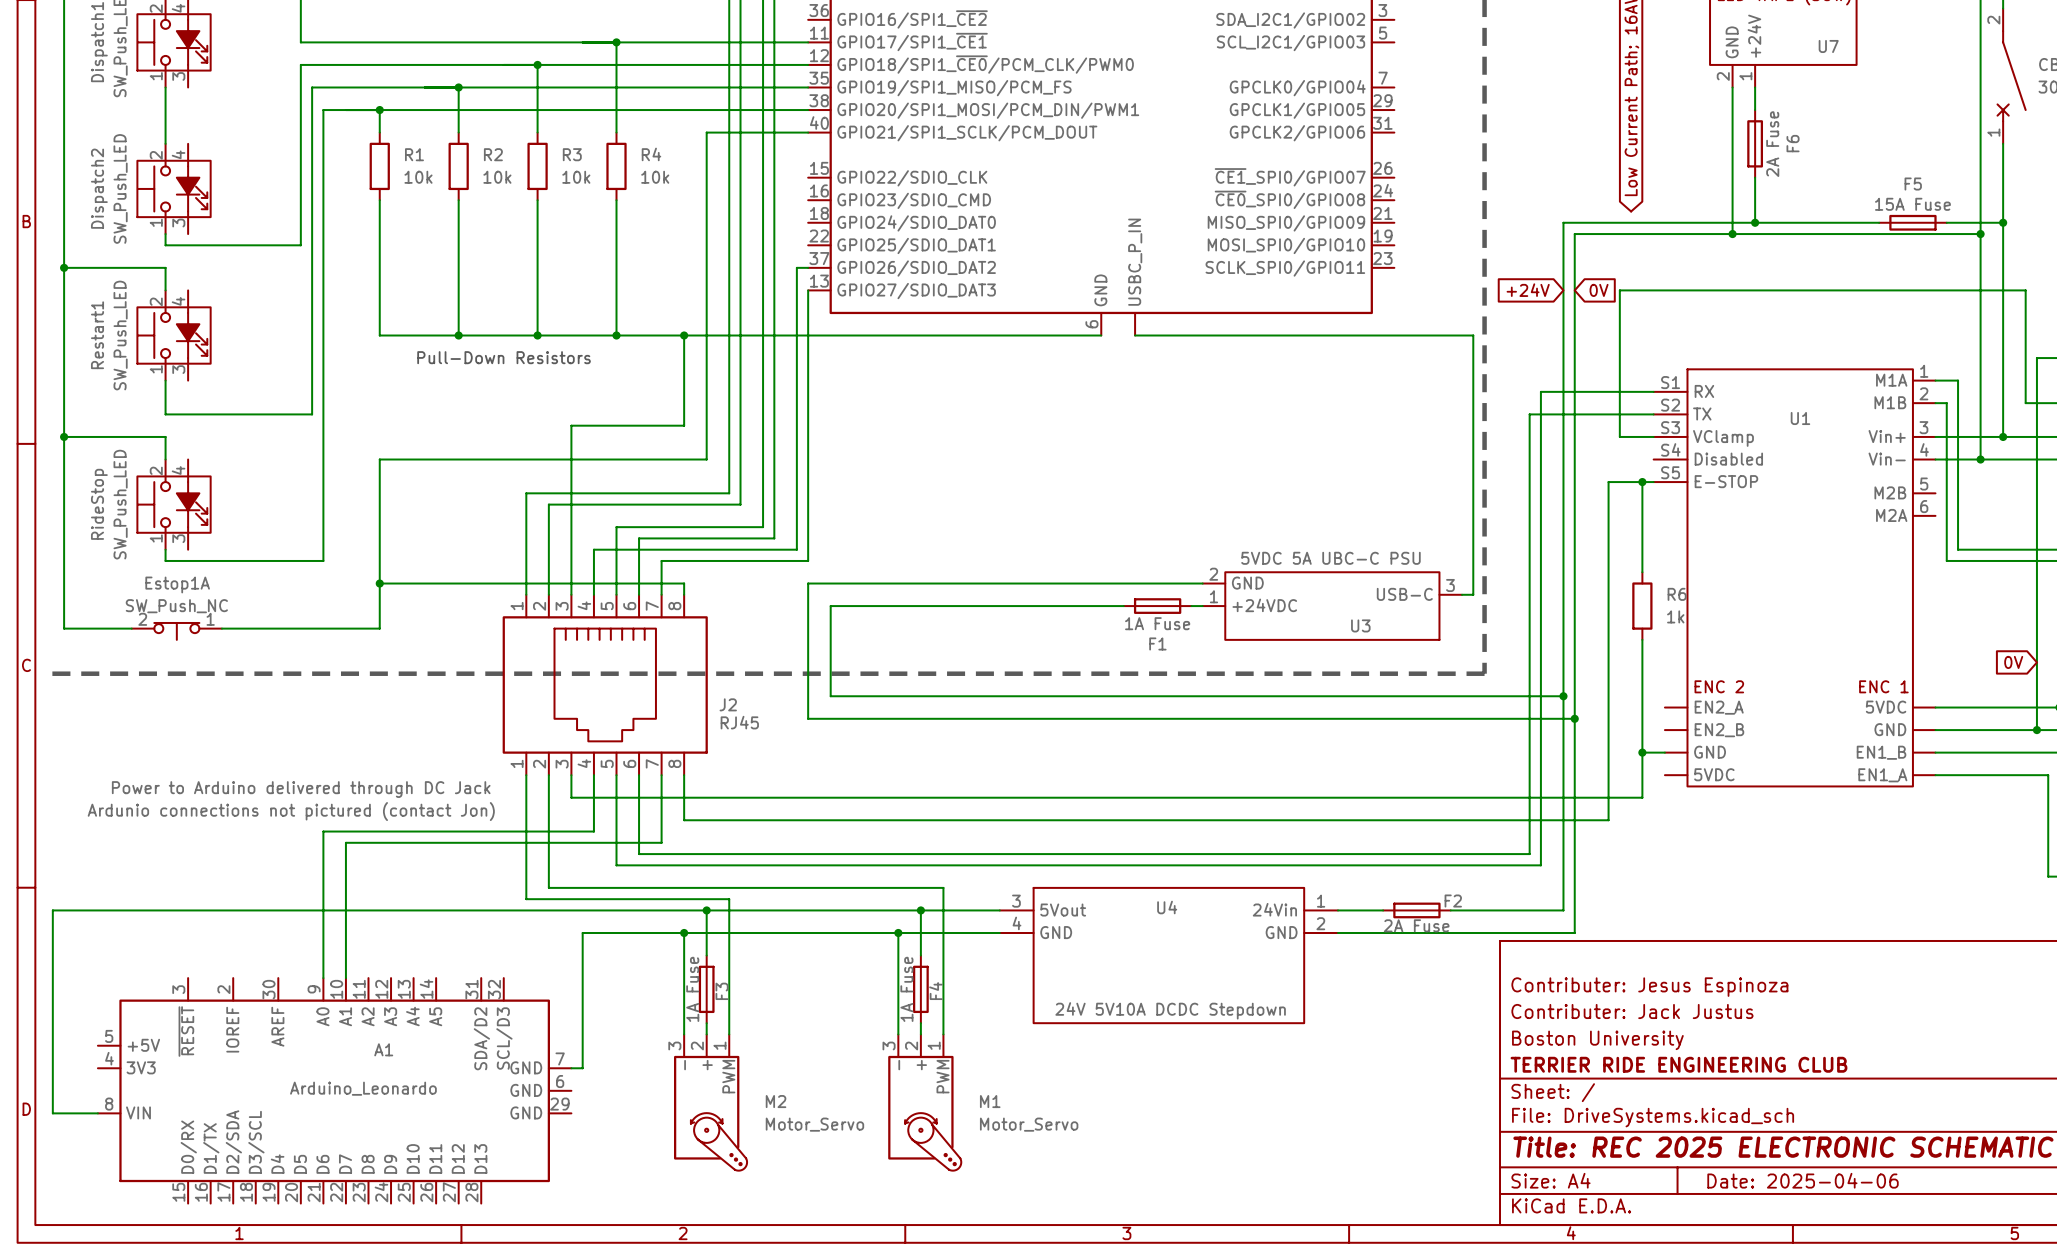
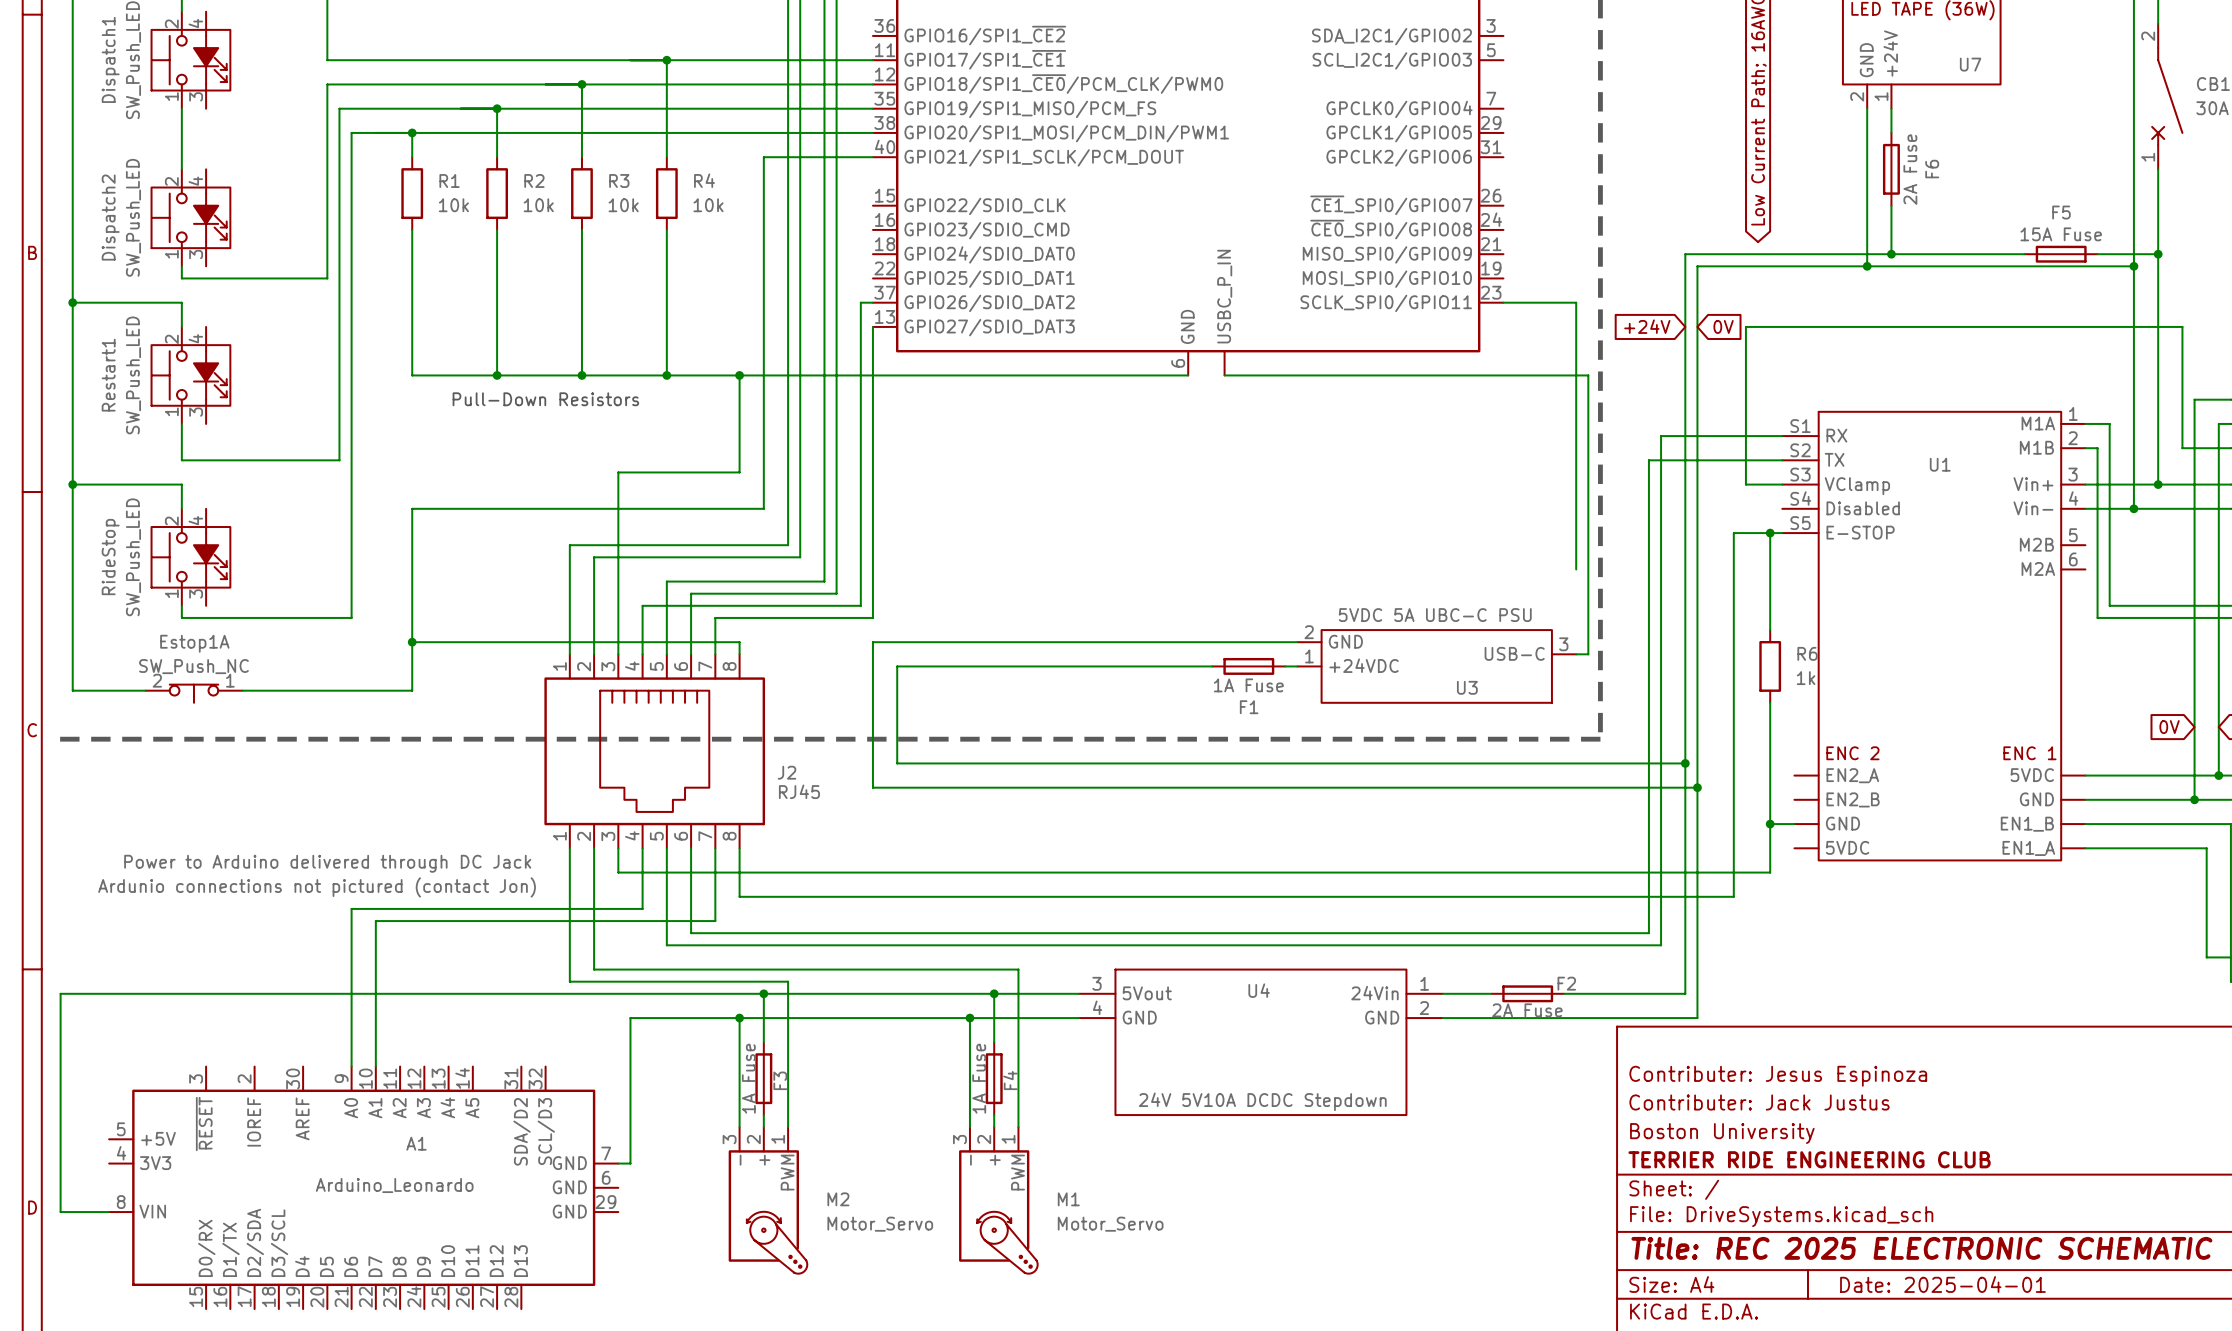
wire: none -> (1503, 302) (1576, 302) (1576, 569)
title block: Date: 2025-04-06 (1803, 1180) -> Date: 2025-04-01 (1942, 1284)

